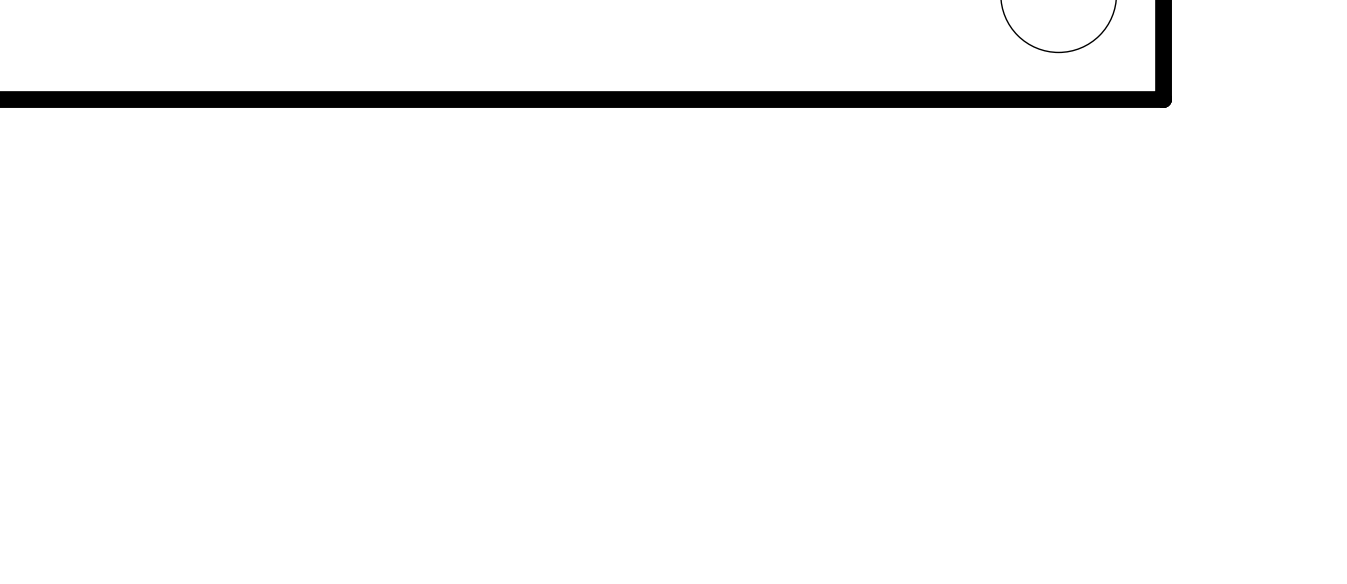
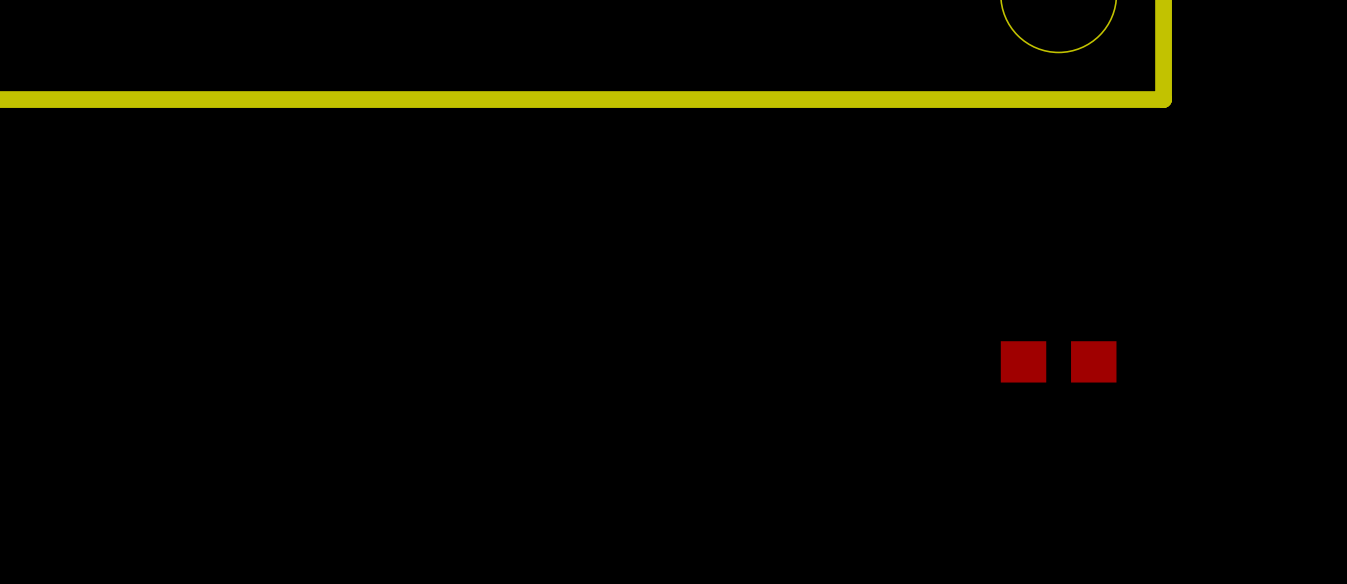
part: none -> (1058, 361)

